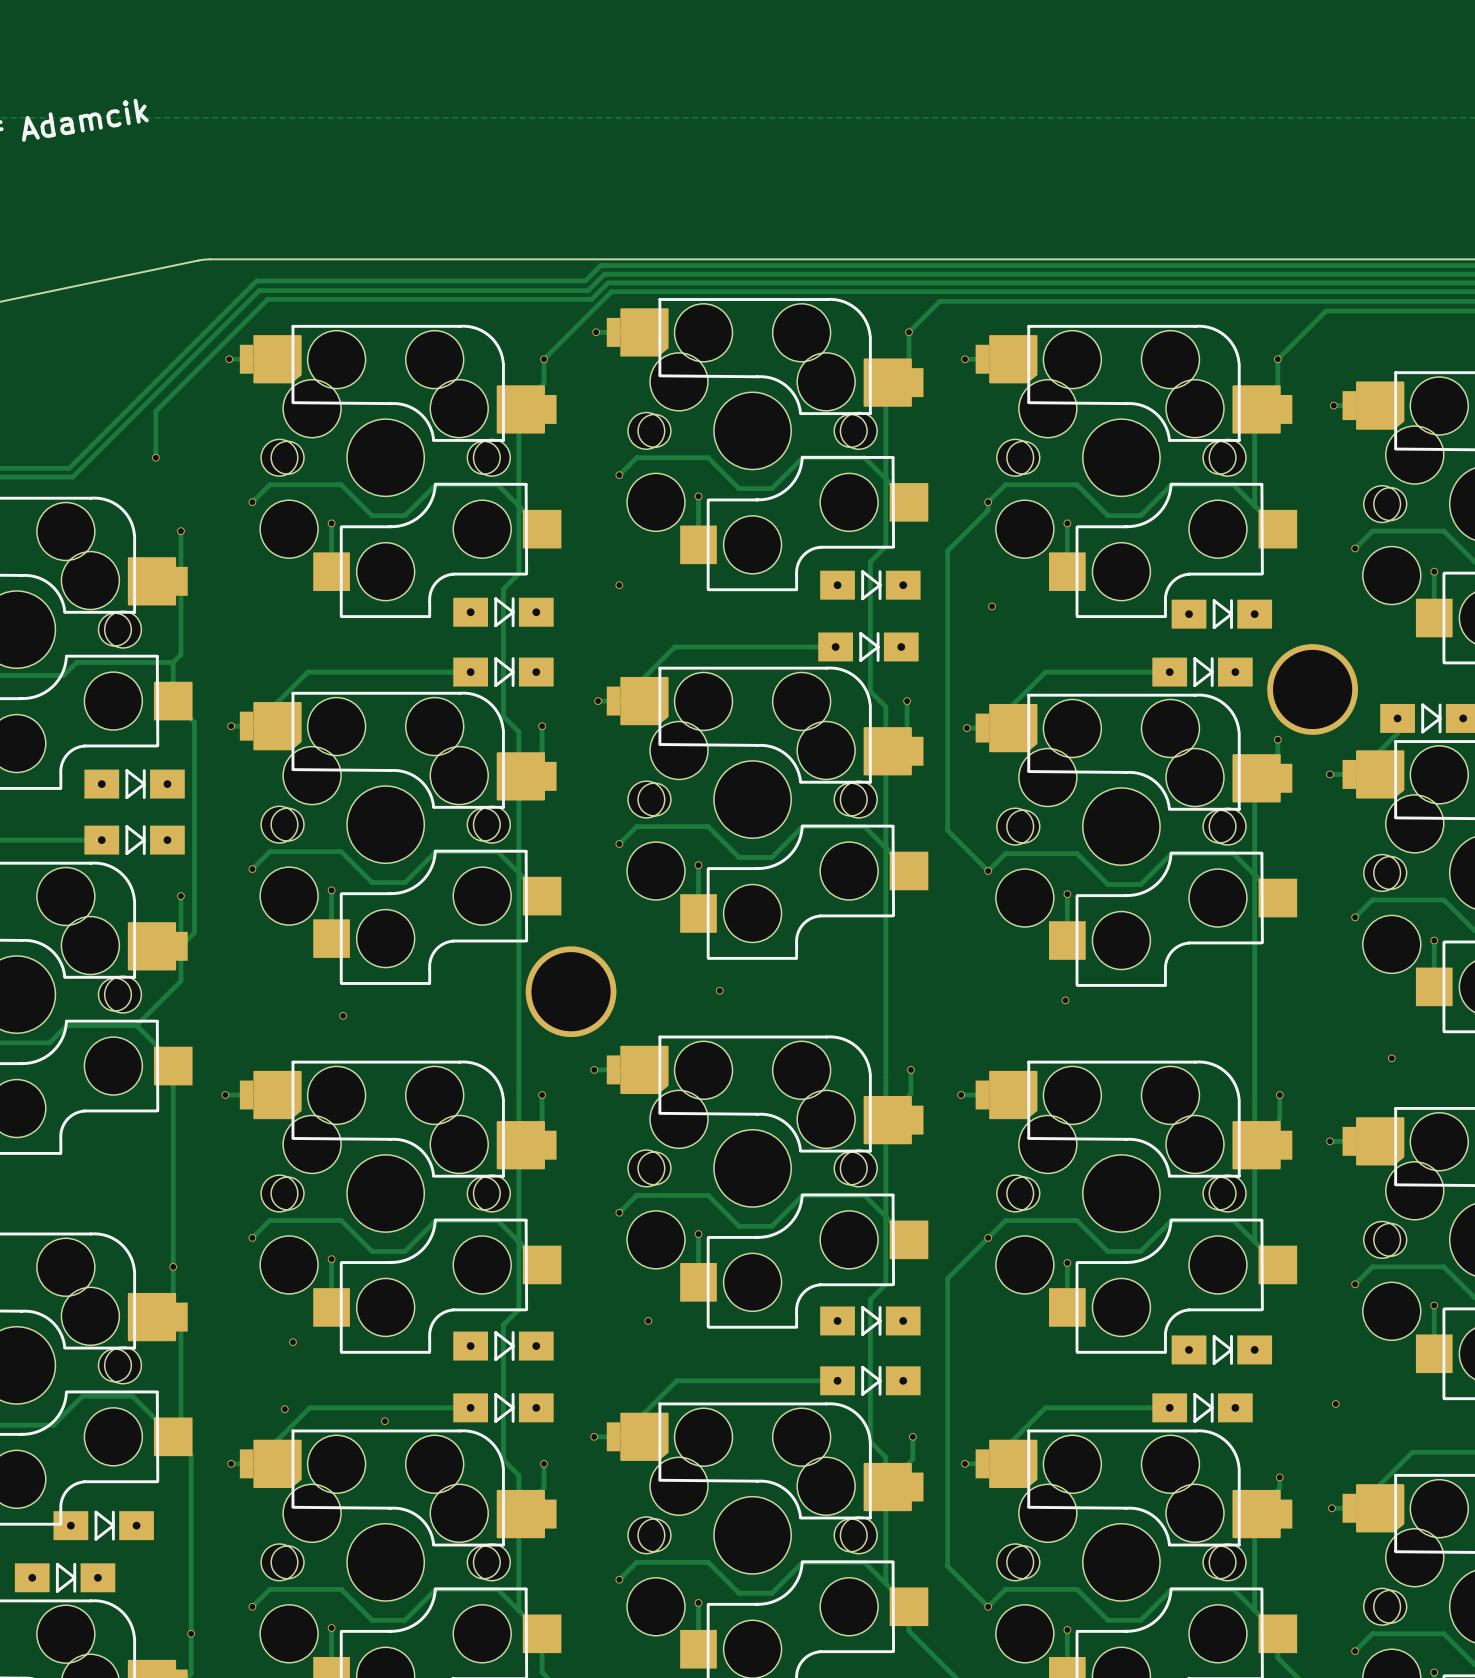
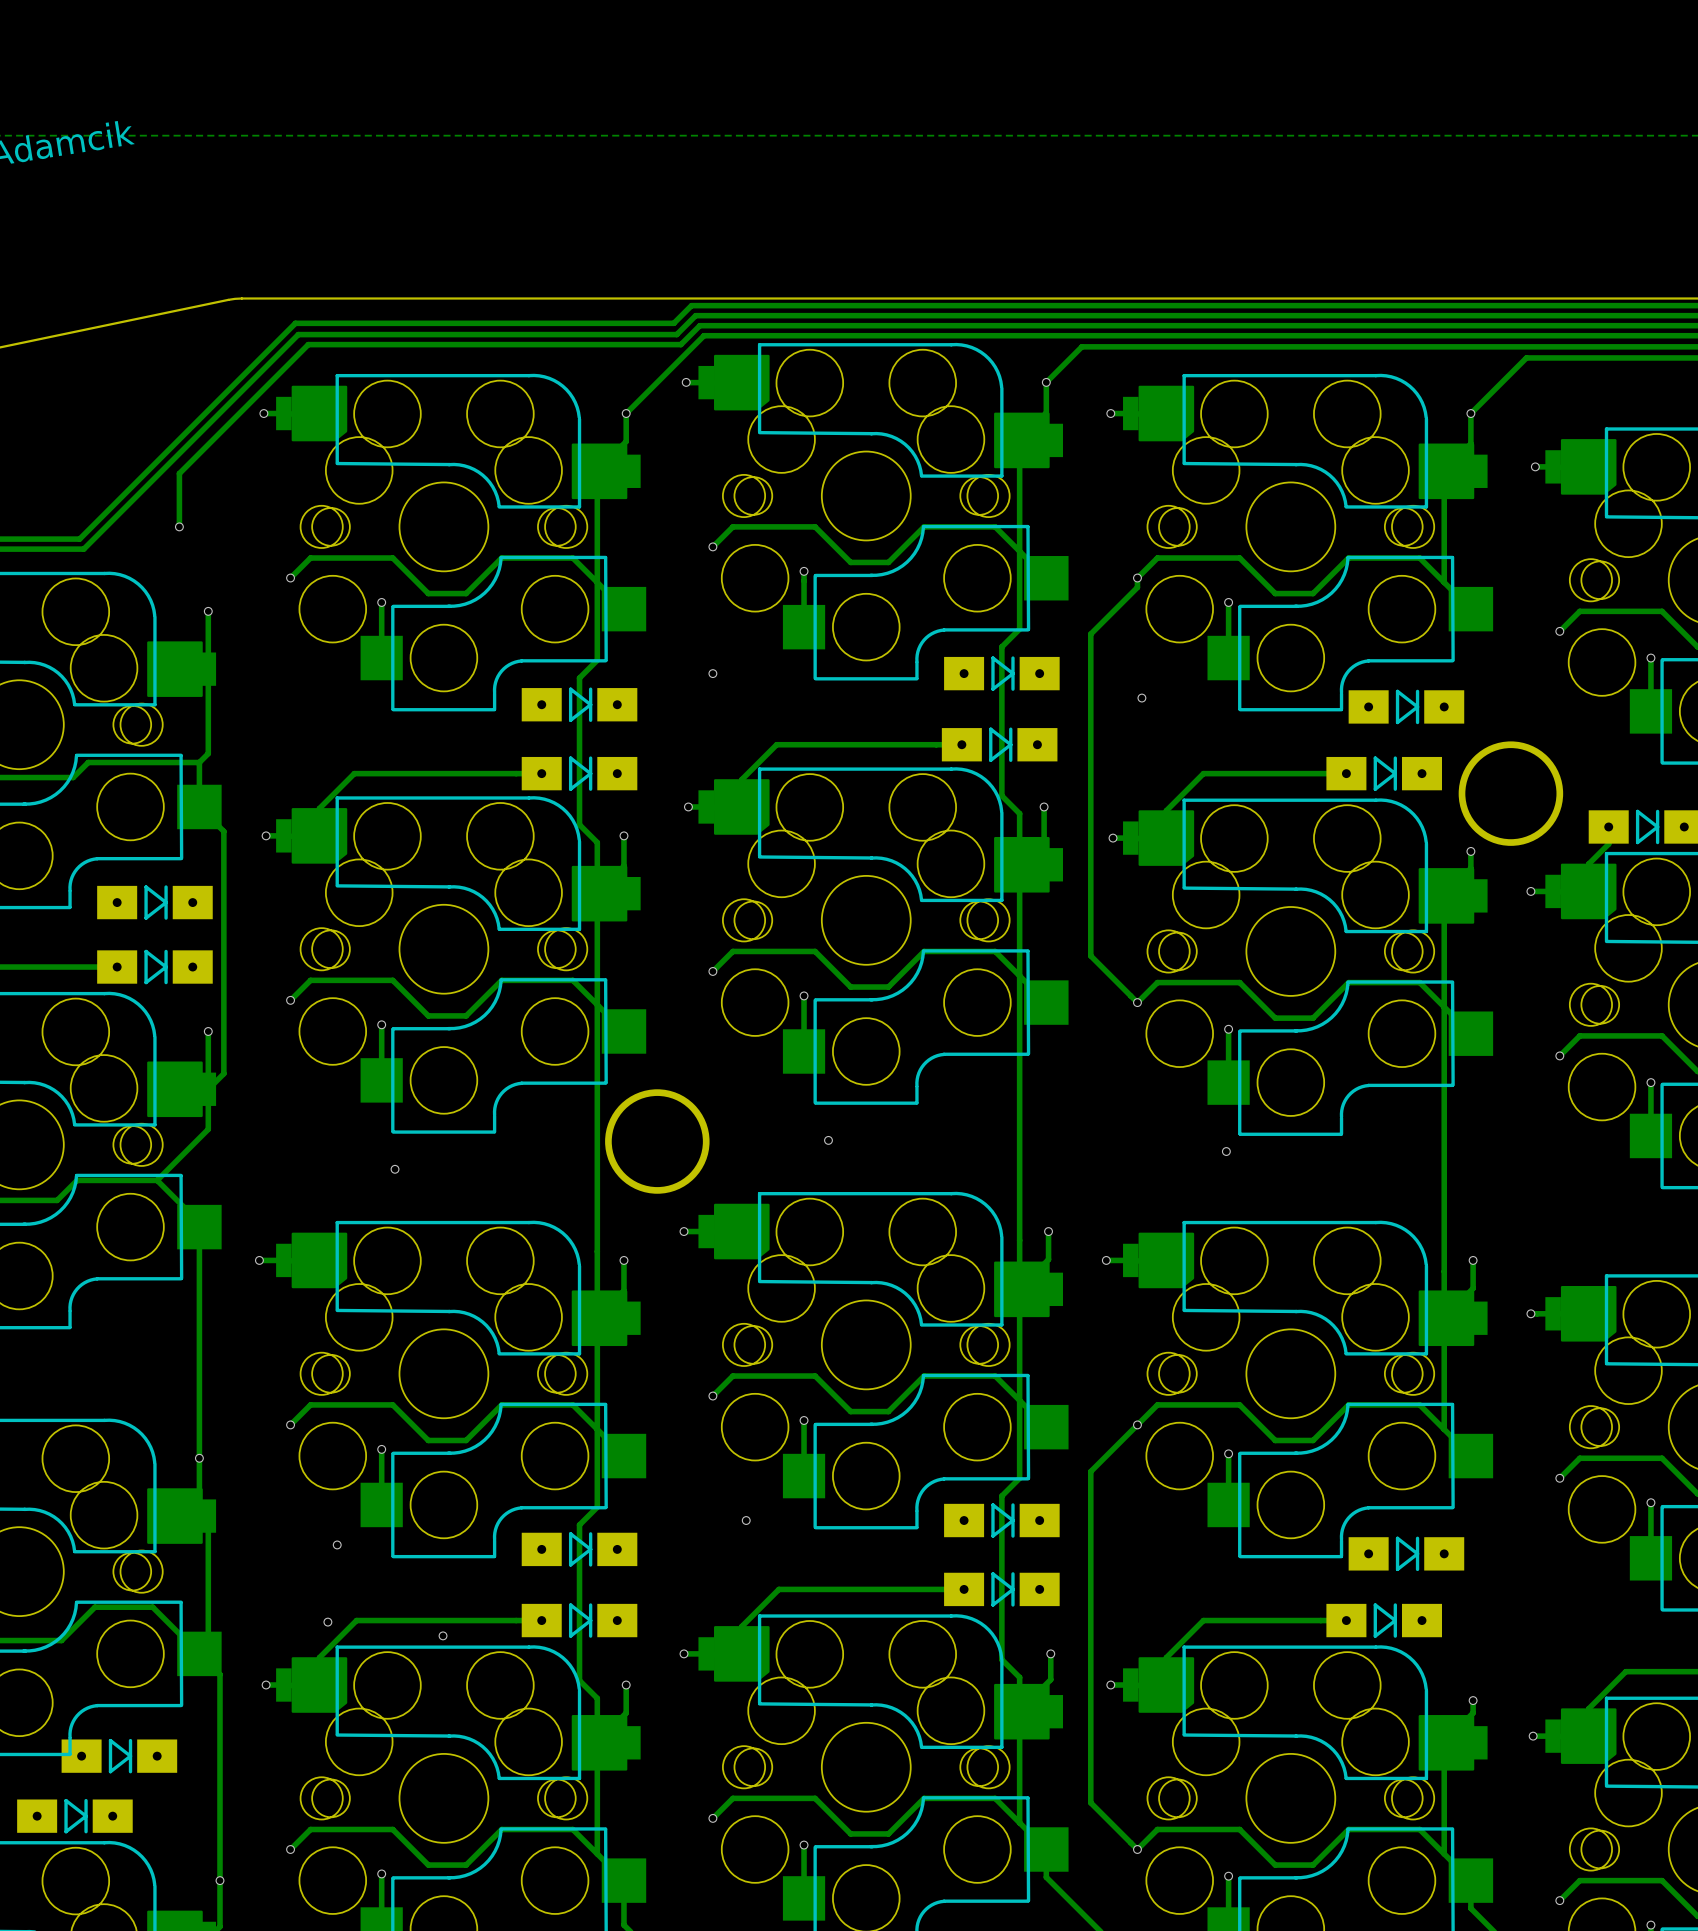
via: (1391, 1058) -> none
via: (1335, 1403) -> none

